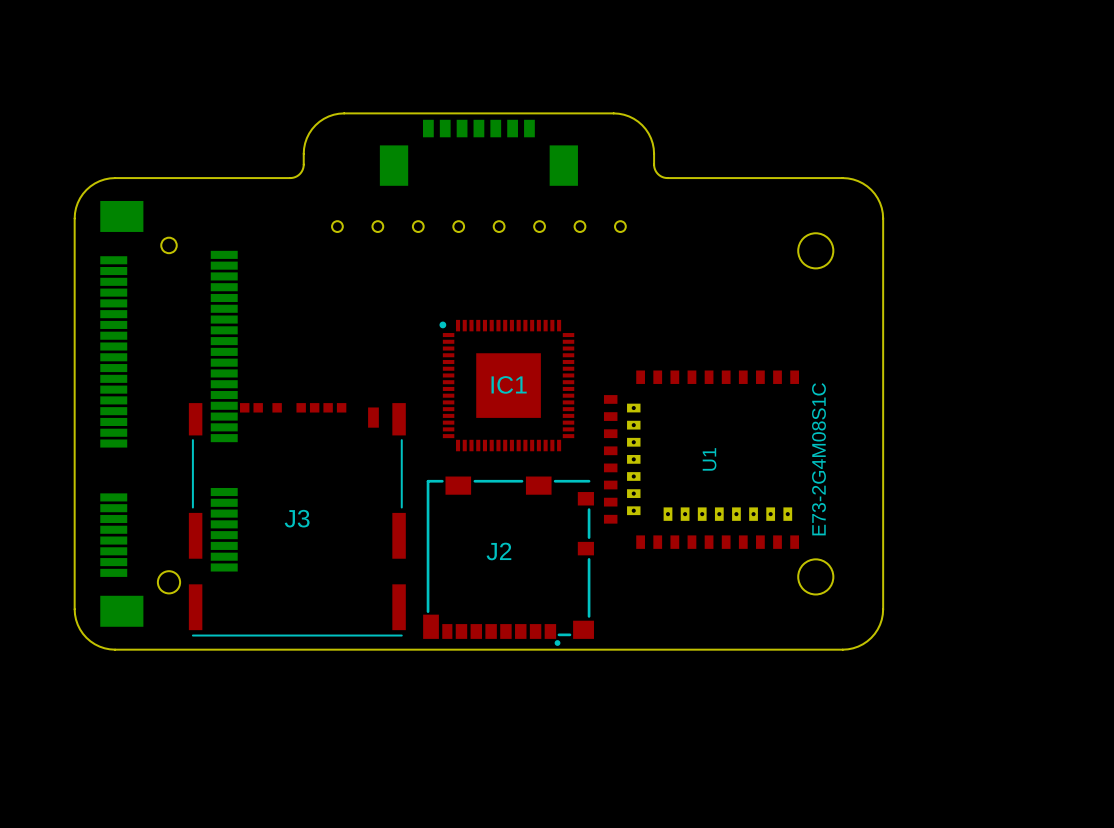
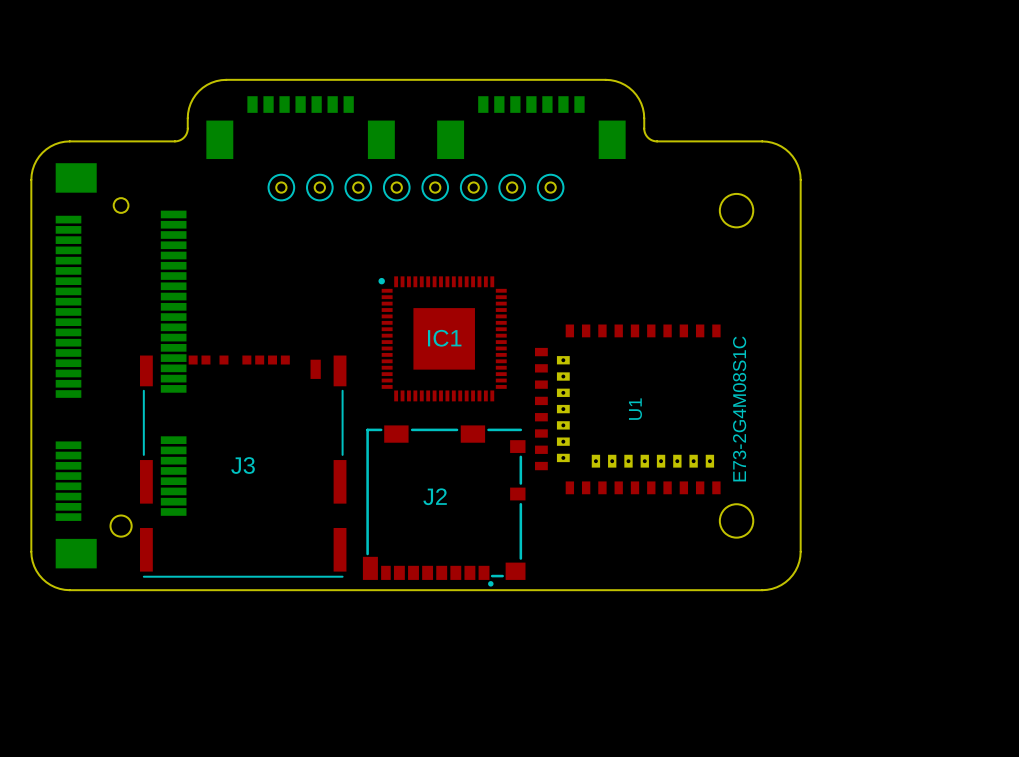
board edge: (344, 113) (328, 116) (312, 129) (305, 143) (303, 168) (297, 176) (290, 178) (225, 178) -> (287, 79) (226, 79) (206, 85) (199, 91) (190, 103) (186, 134) (181, 139) (174, 141)
board edge: (613, 113) (629, 116) (645, 129) (652, 143) (654, 168) (660, 176) (667, 178) (732, 178) -> (544, 79) (605, 79) (625, 85) (632, 91) (641, 103) (645, 134) (650, 139) (657, 141)
part: (478, 152) -> none
part: none -> (300, 127)
part: none -> (531, 127)
drawing: none -> [267, 173, 565, 202]

